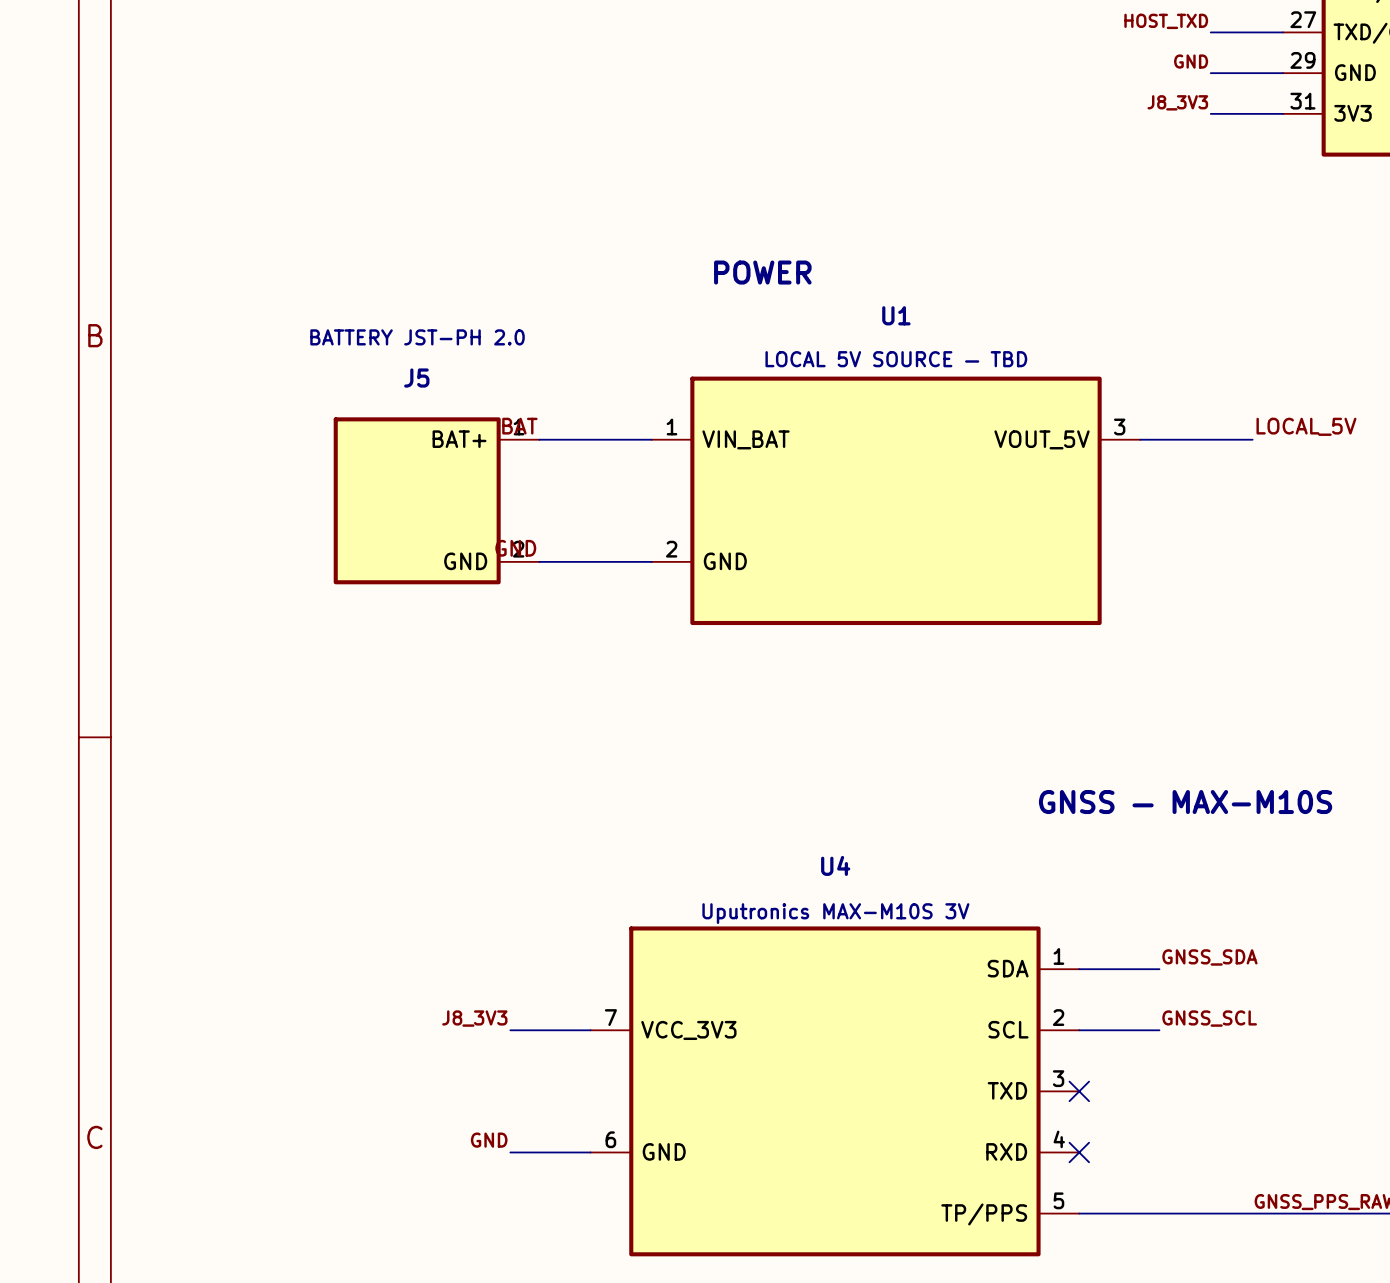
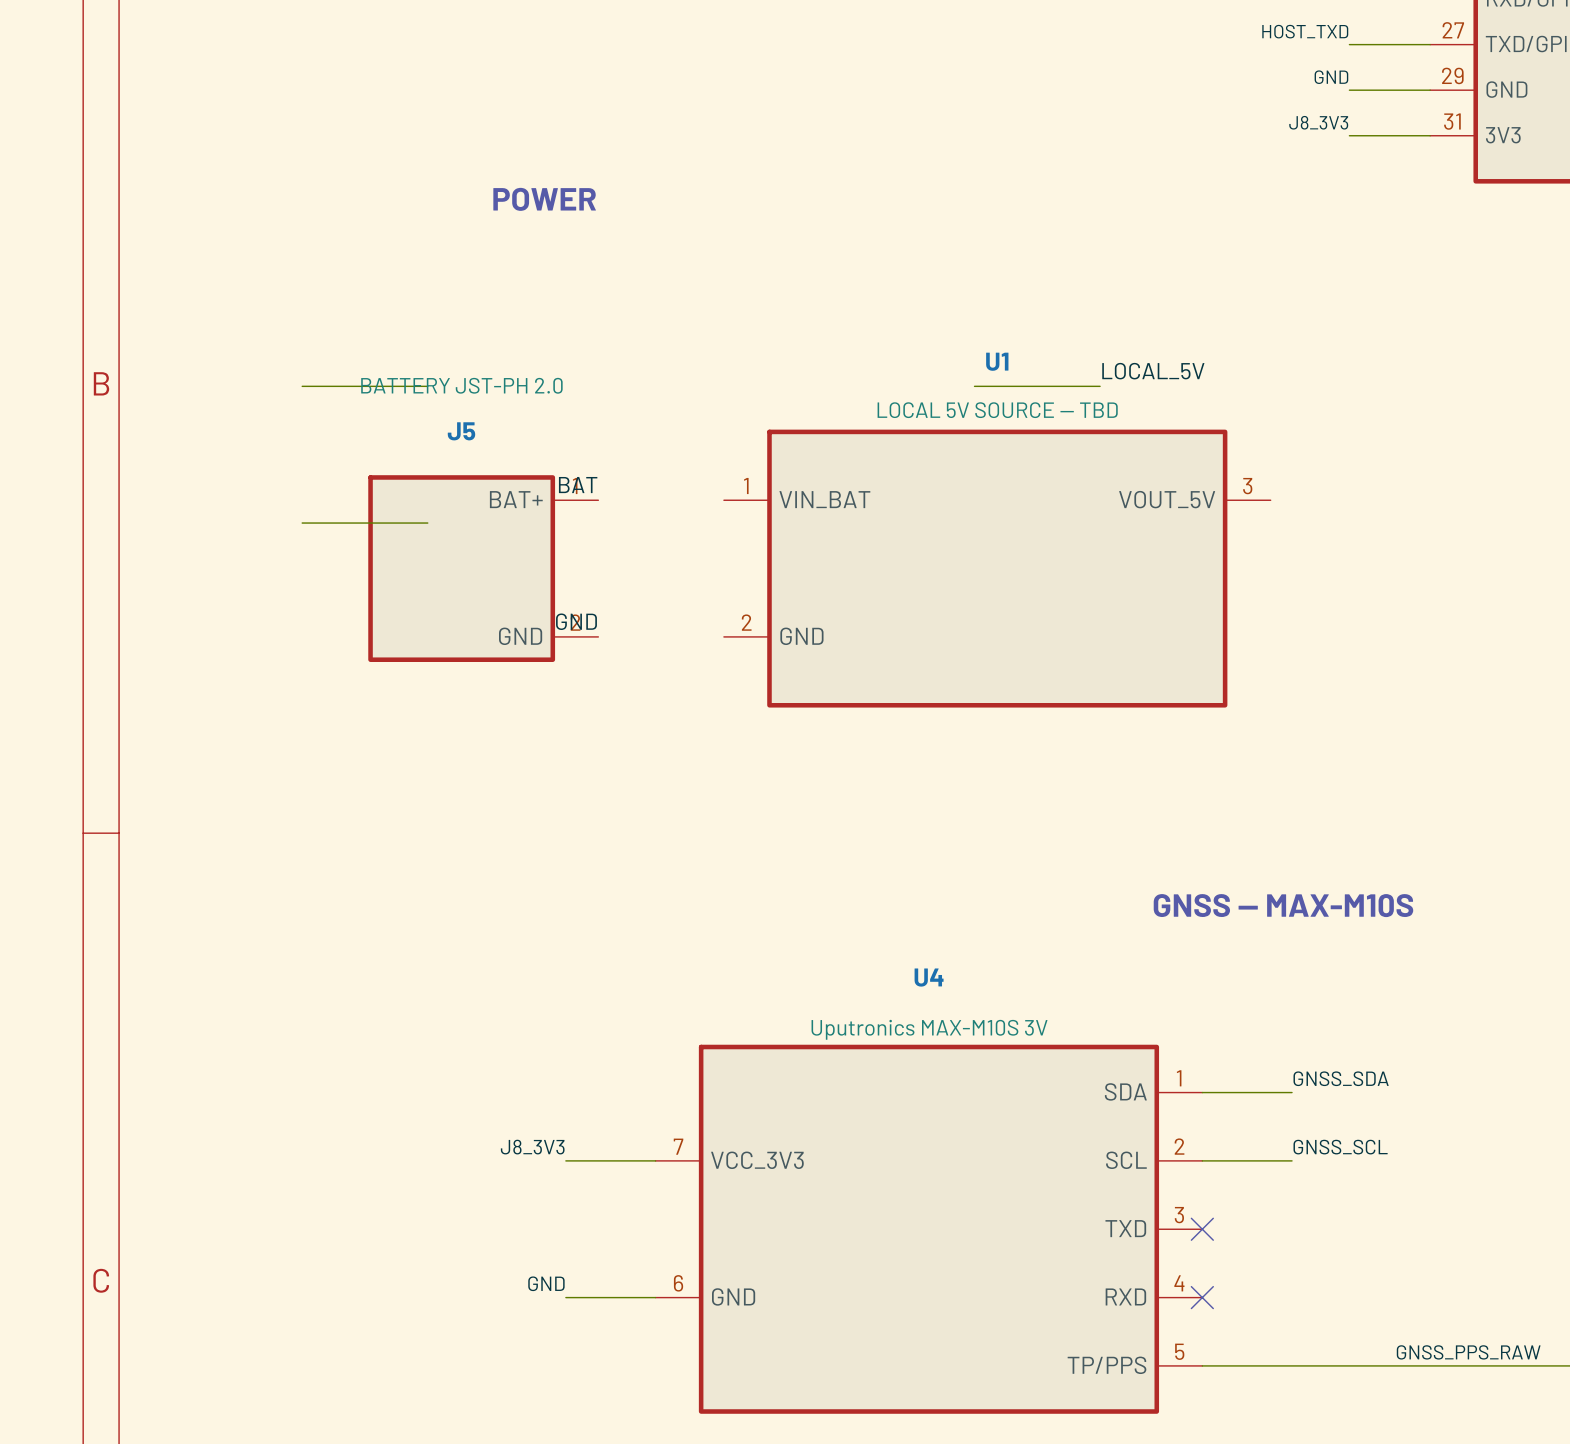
text position: POWER (762, 272) -> POWER (544, 199)
label position: LOCAL_5V (1306, 426) -> LOCAL_5V (1153, 371)
wire: (539, 439) (651, 439) -> (302, 386) (427, 386)
wire: (1140, 439) (1252, 439) -> (974, 386) (1100, 386)
wire: (539, 561) (651, 561) -> (302, 523) (427, 523)

